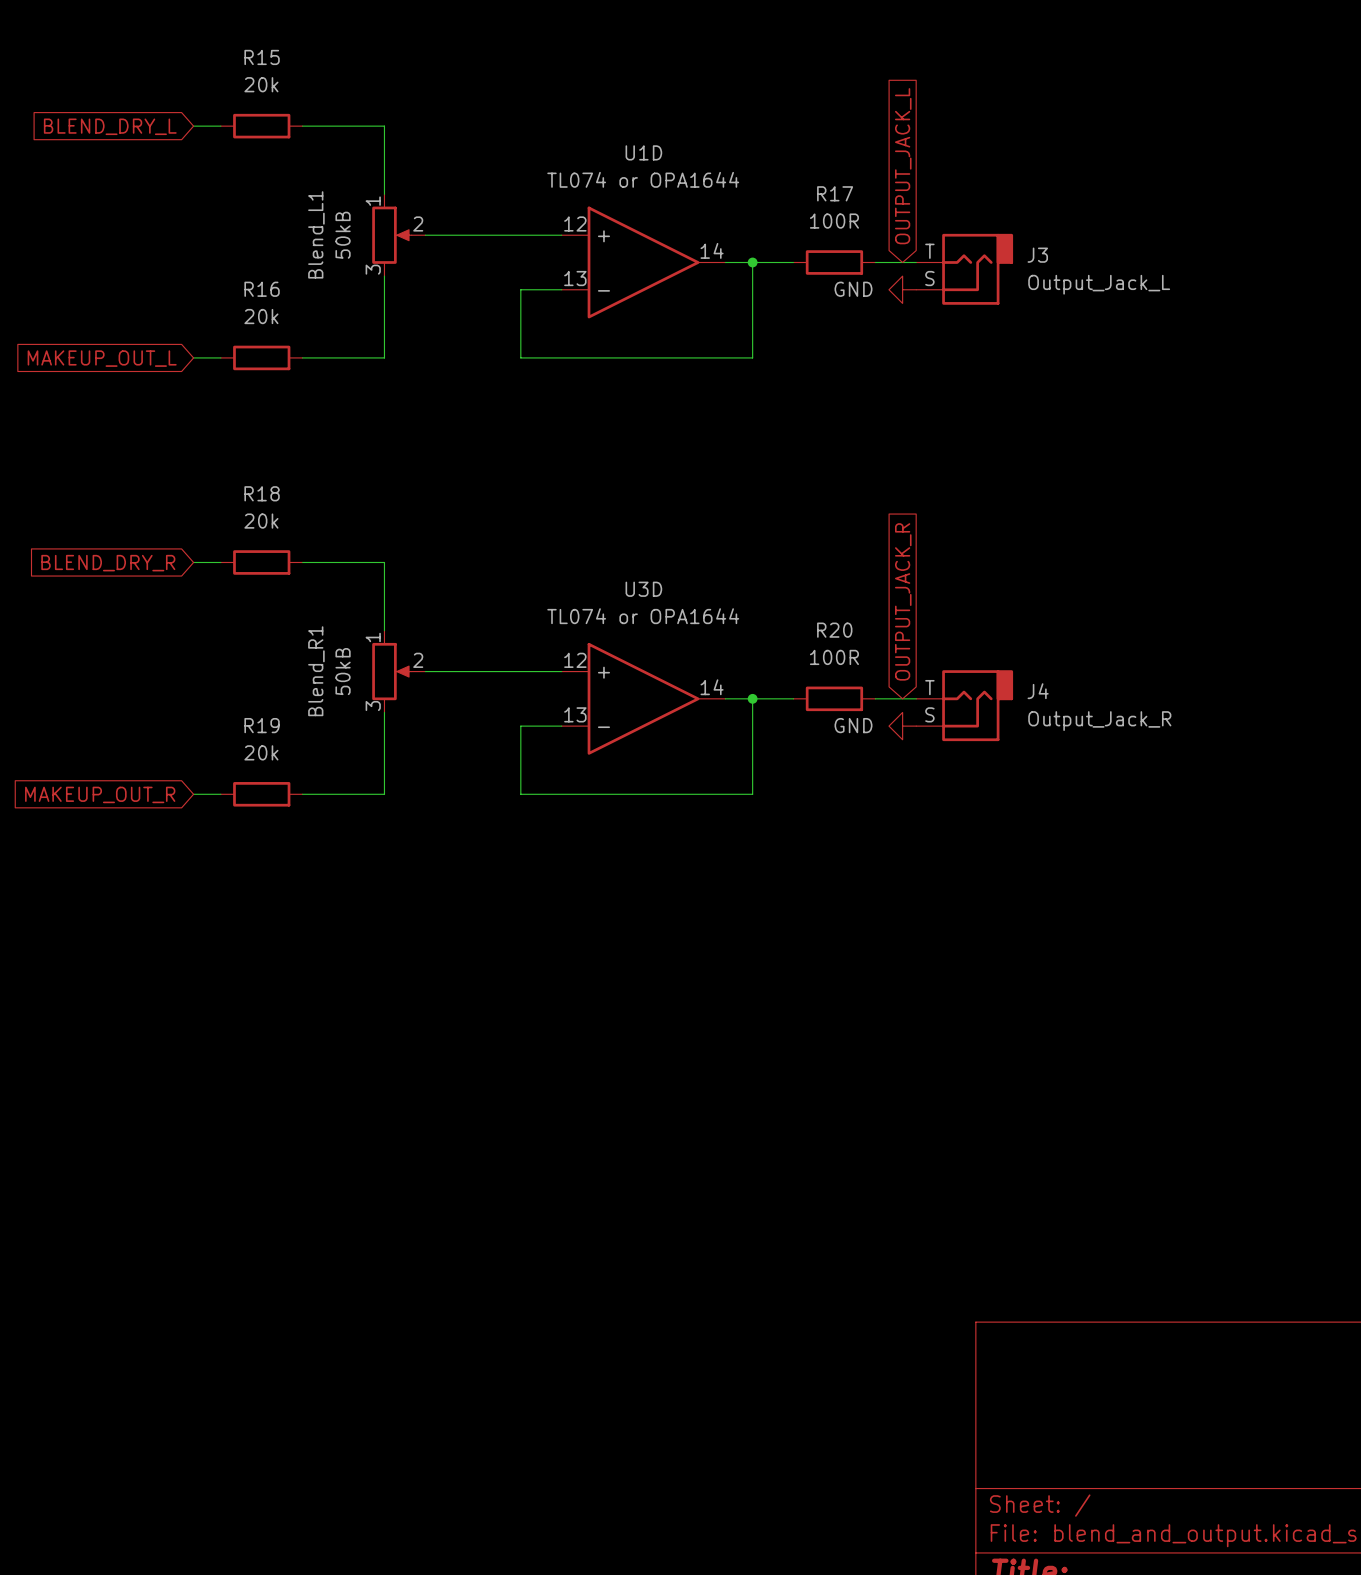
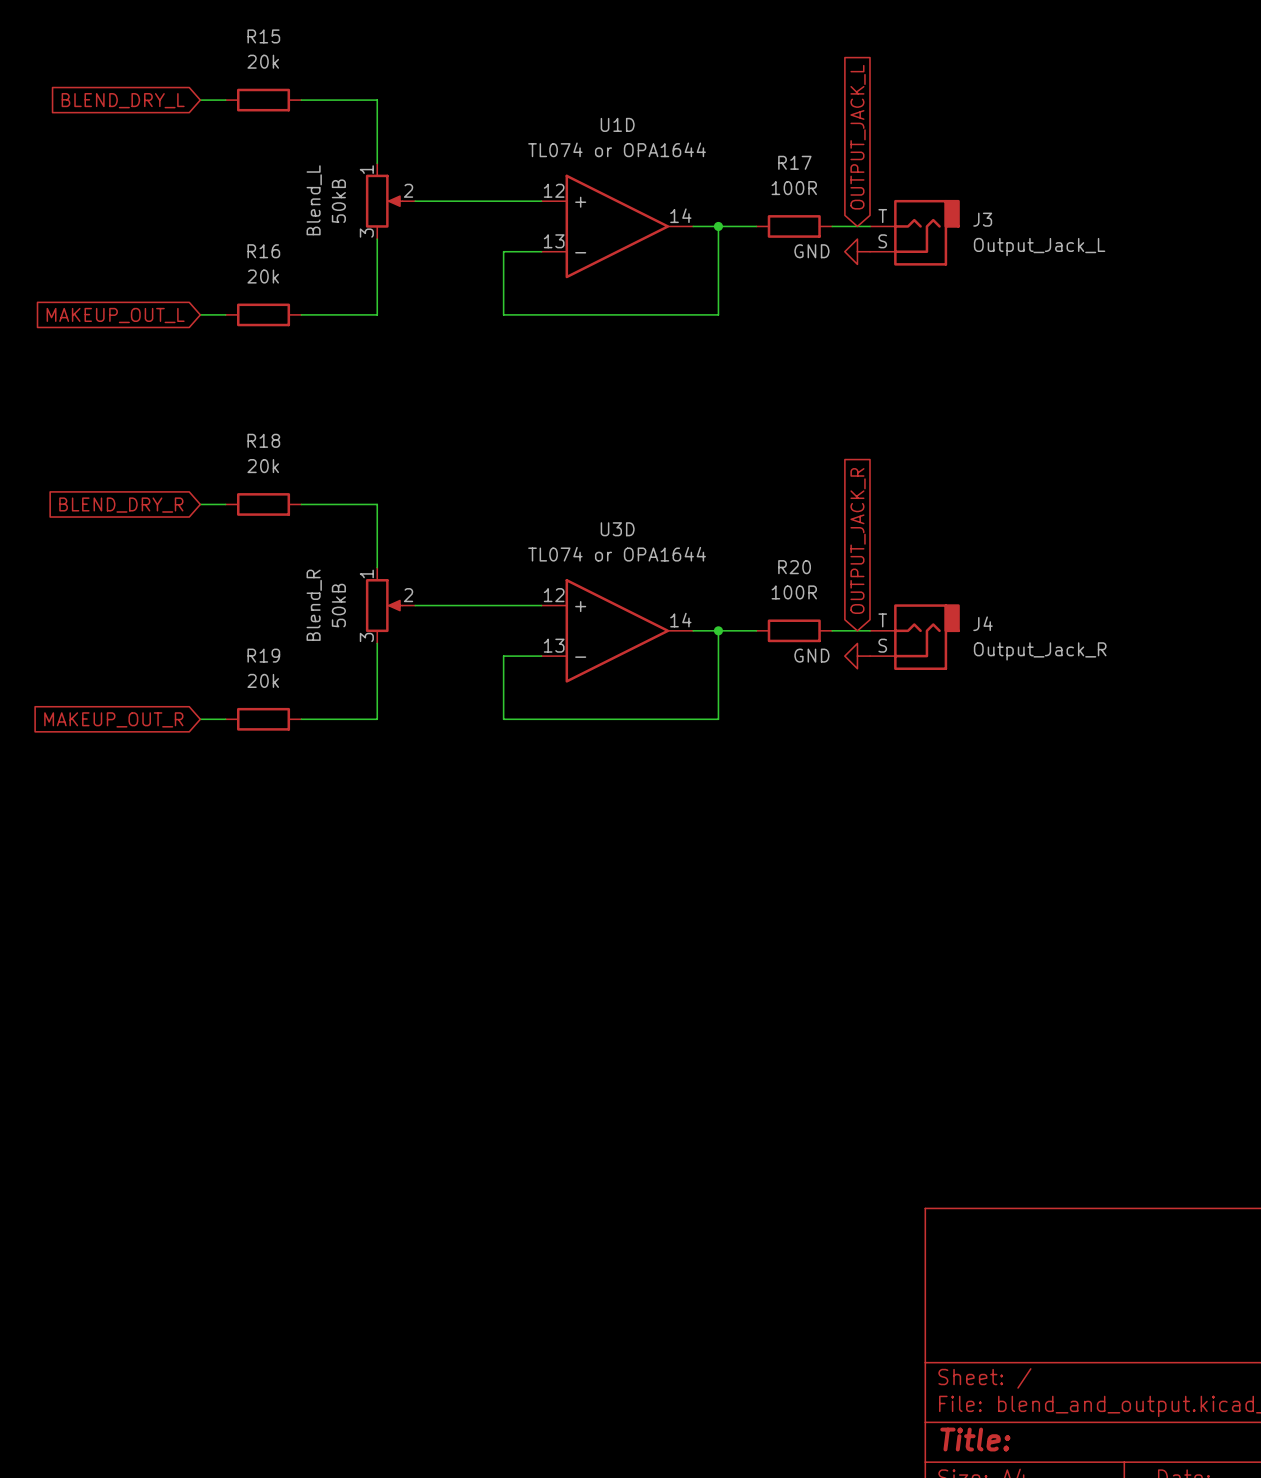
Blend_L1 name: Blend_L1 (316, 234) -> Blend_L (314, 200)
Blend_R1 name: Blend_R1 (316, 671) -> Blend_R (314, 605)

